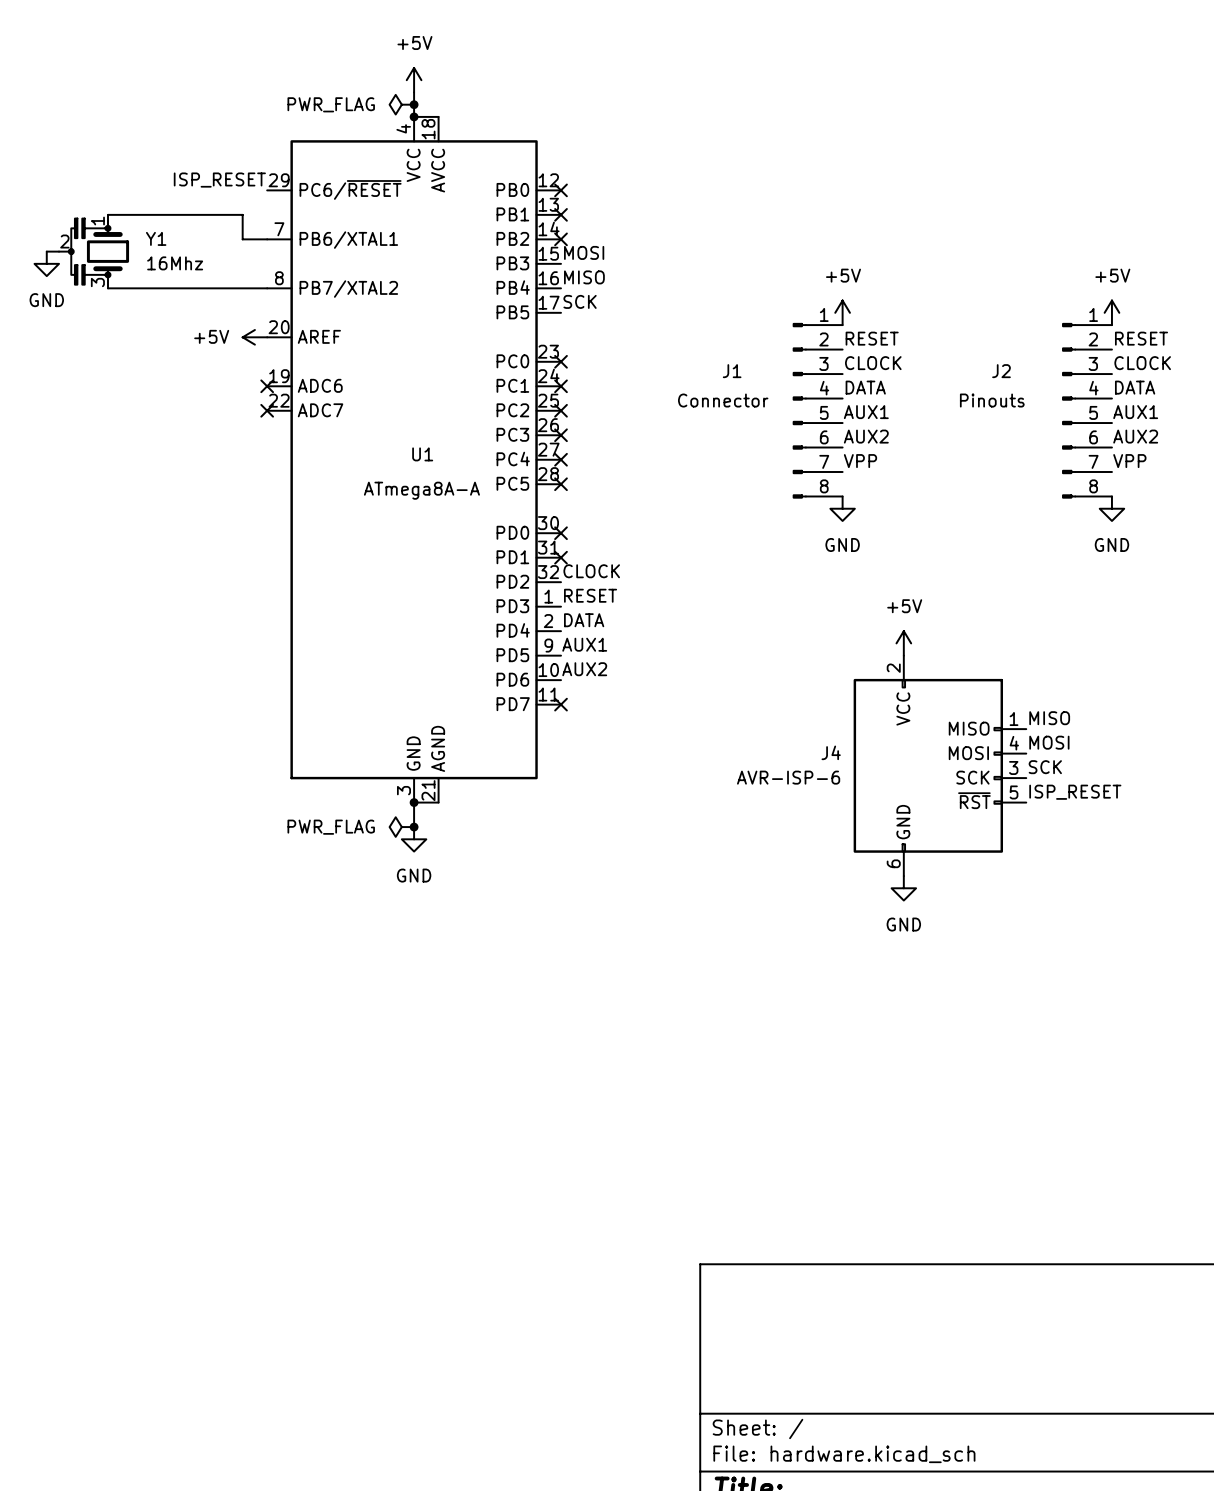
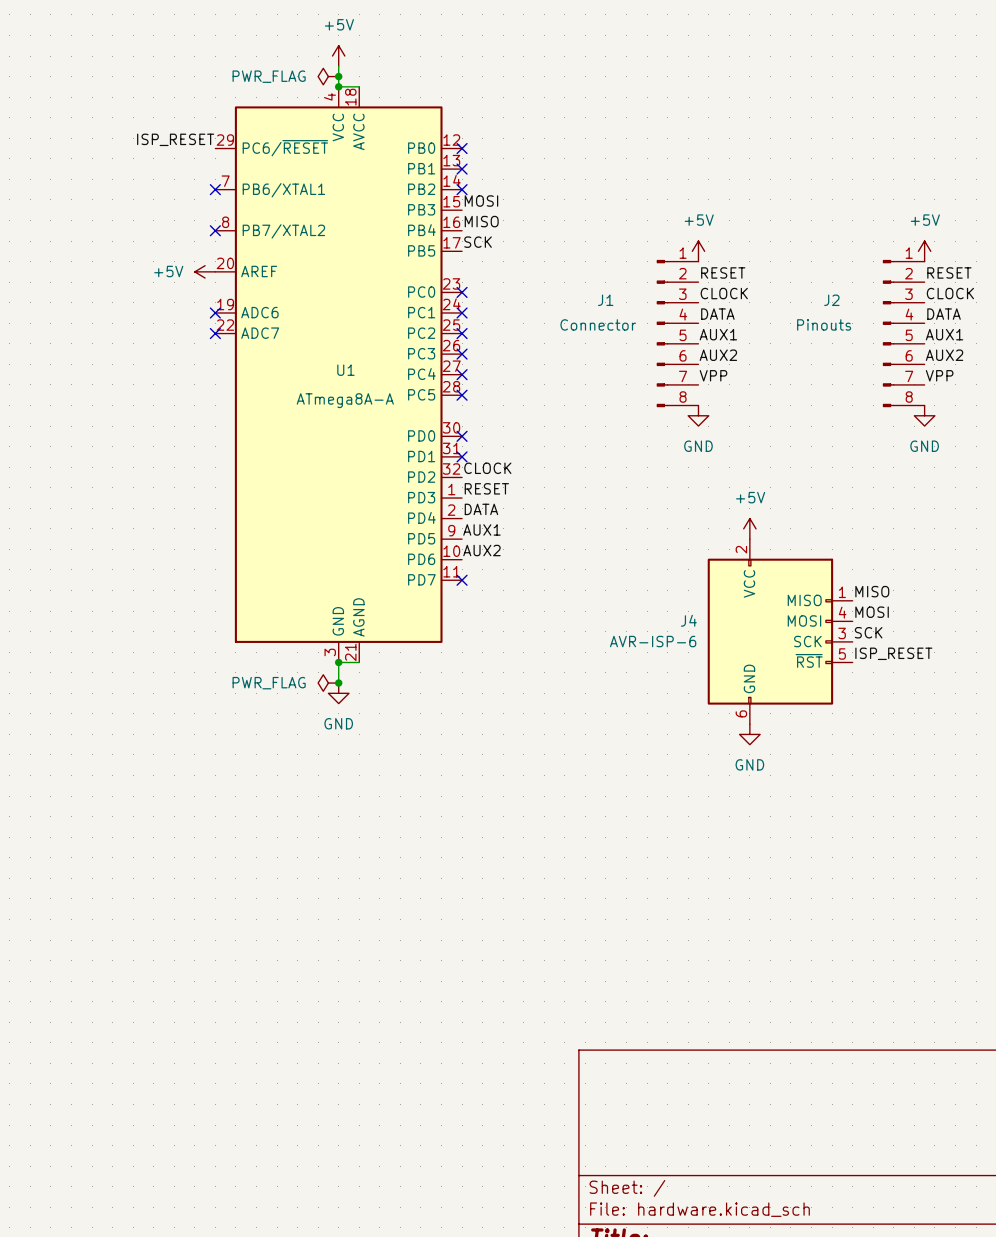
wire: (107, 214) (242, 214) (242, 239) (267, 239) -> none
no-connect mark: none -> (215, 189)
wire: (46, 251) (59, 251) -> none
Y1: 16Mhz (94, 251) -> none
power symbol: GND (46, 263) -> none
wire: (107, 288) (267, 288) -> none
no-connect mark: none -> (215, 230)

